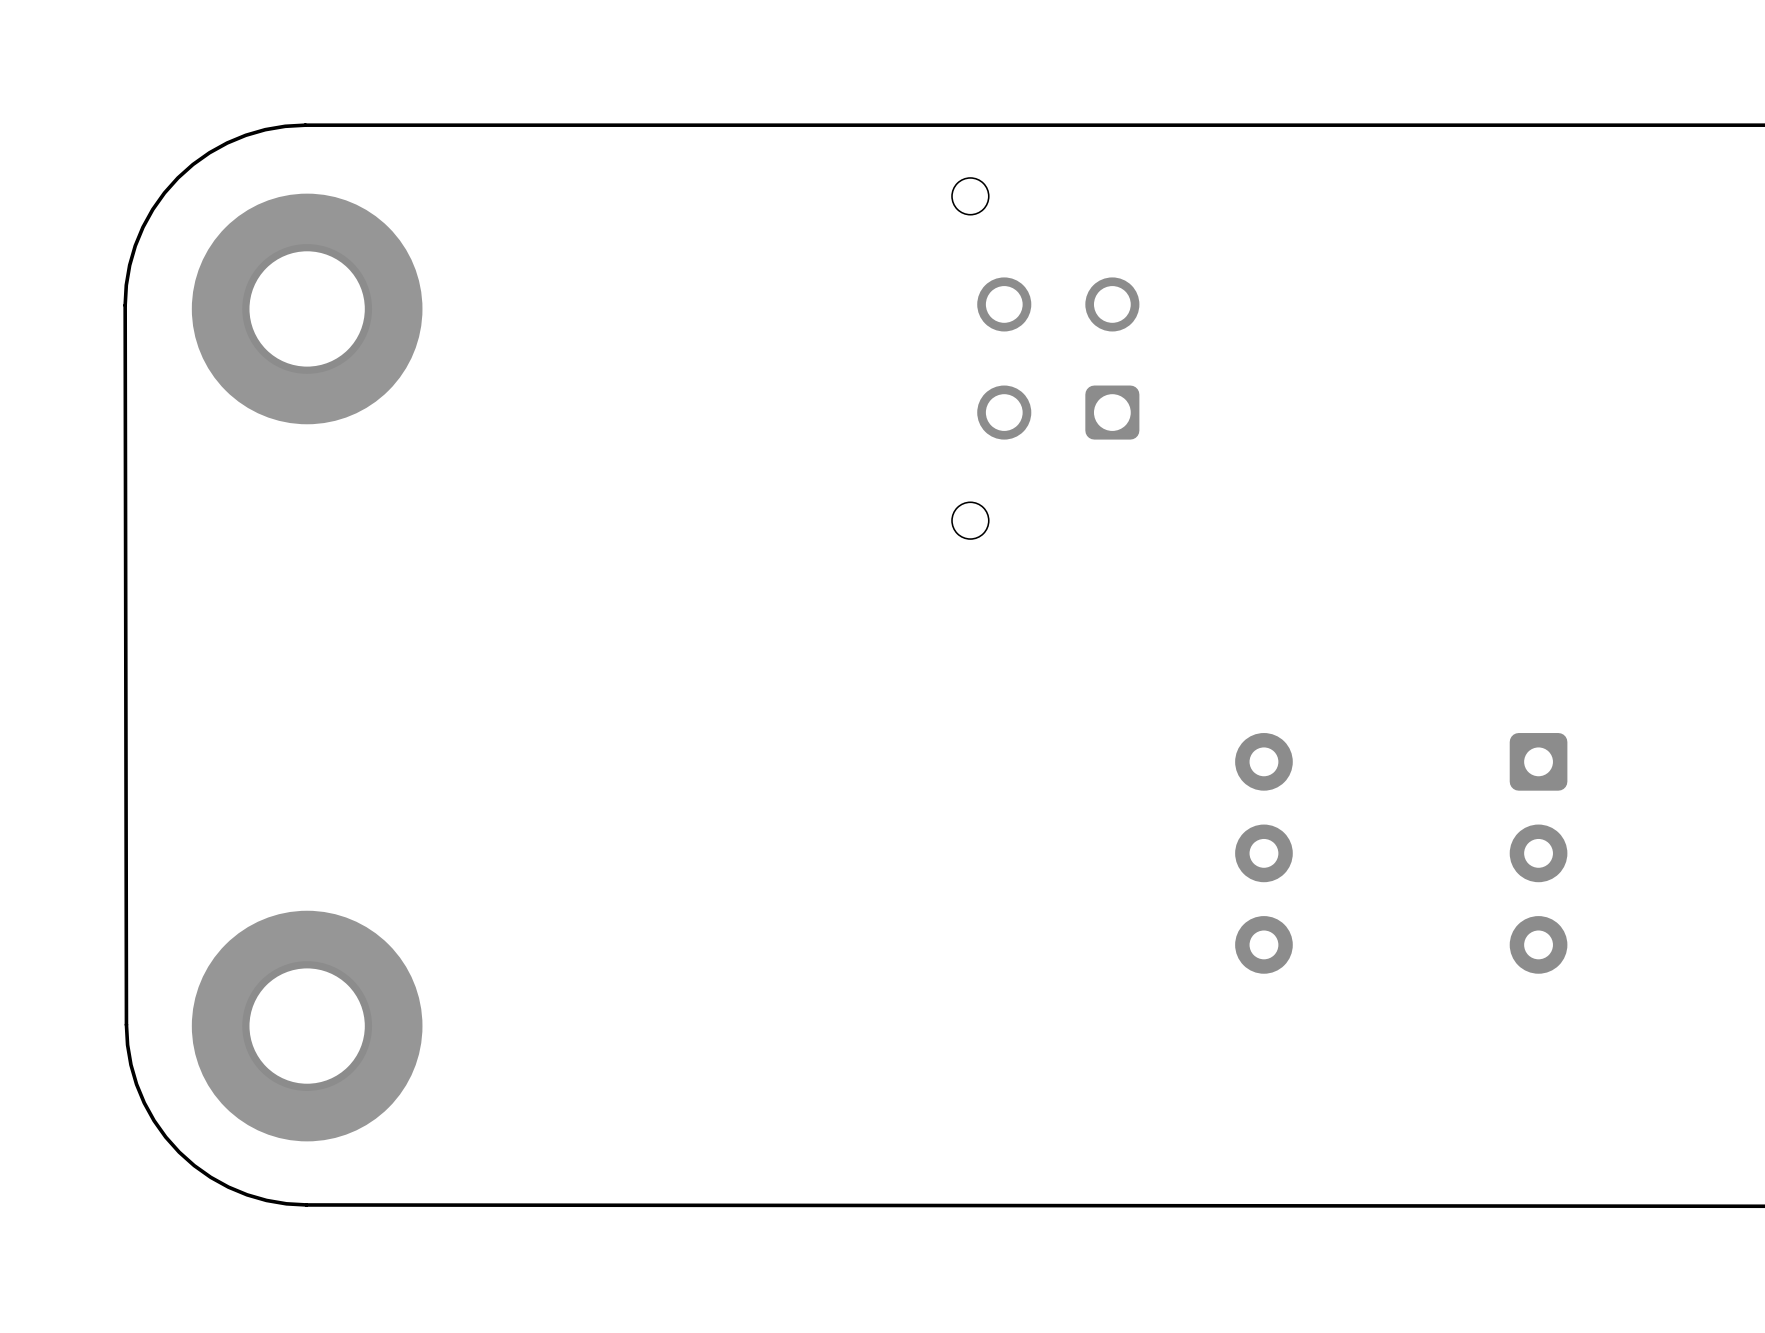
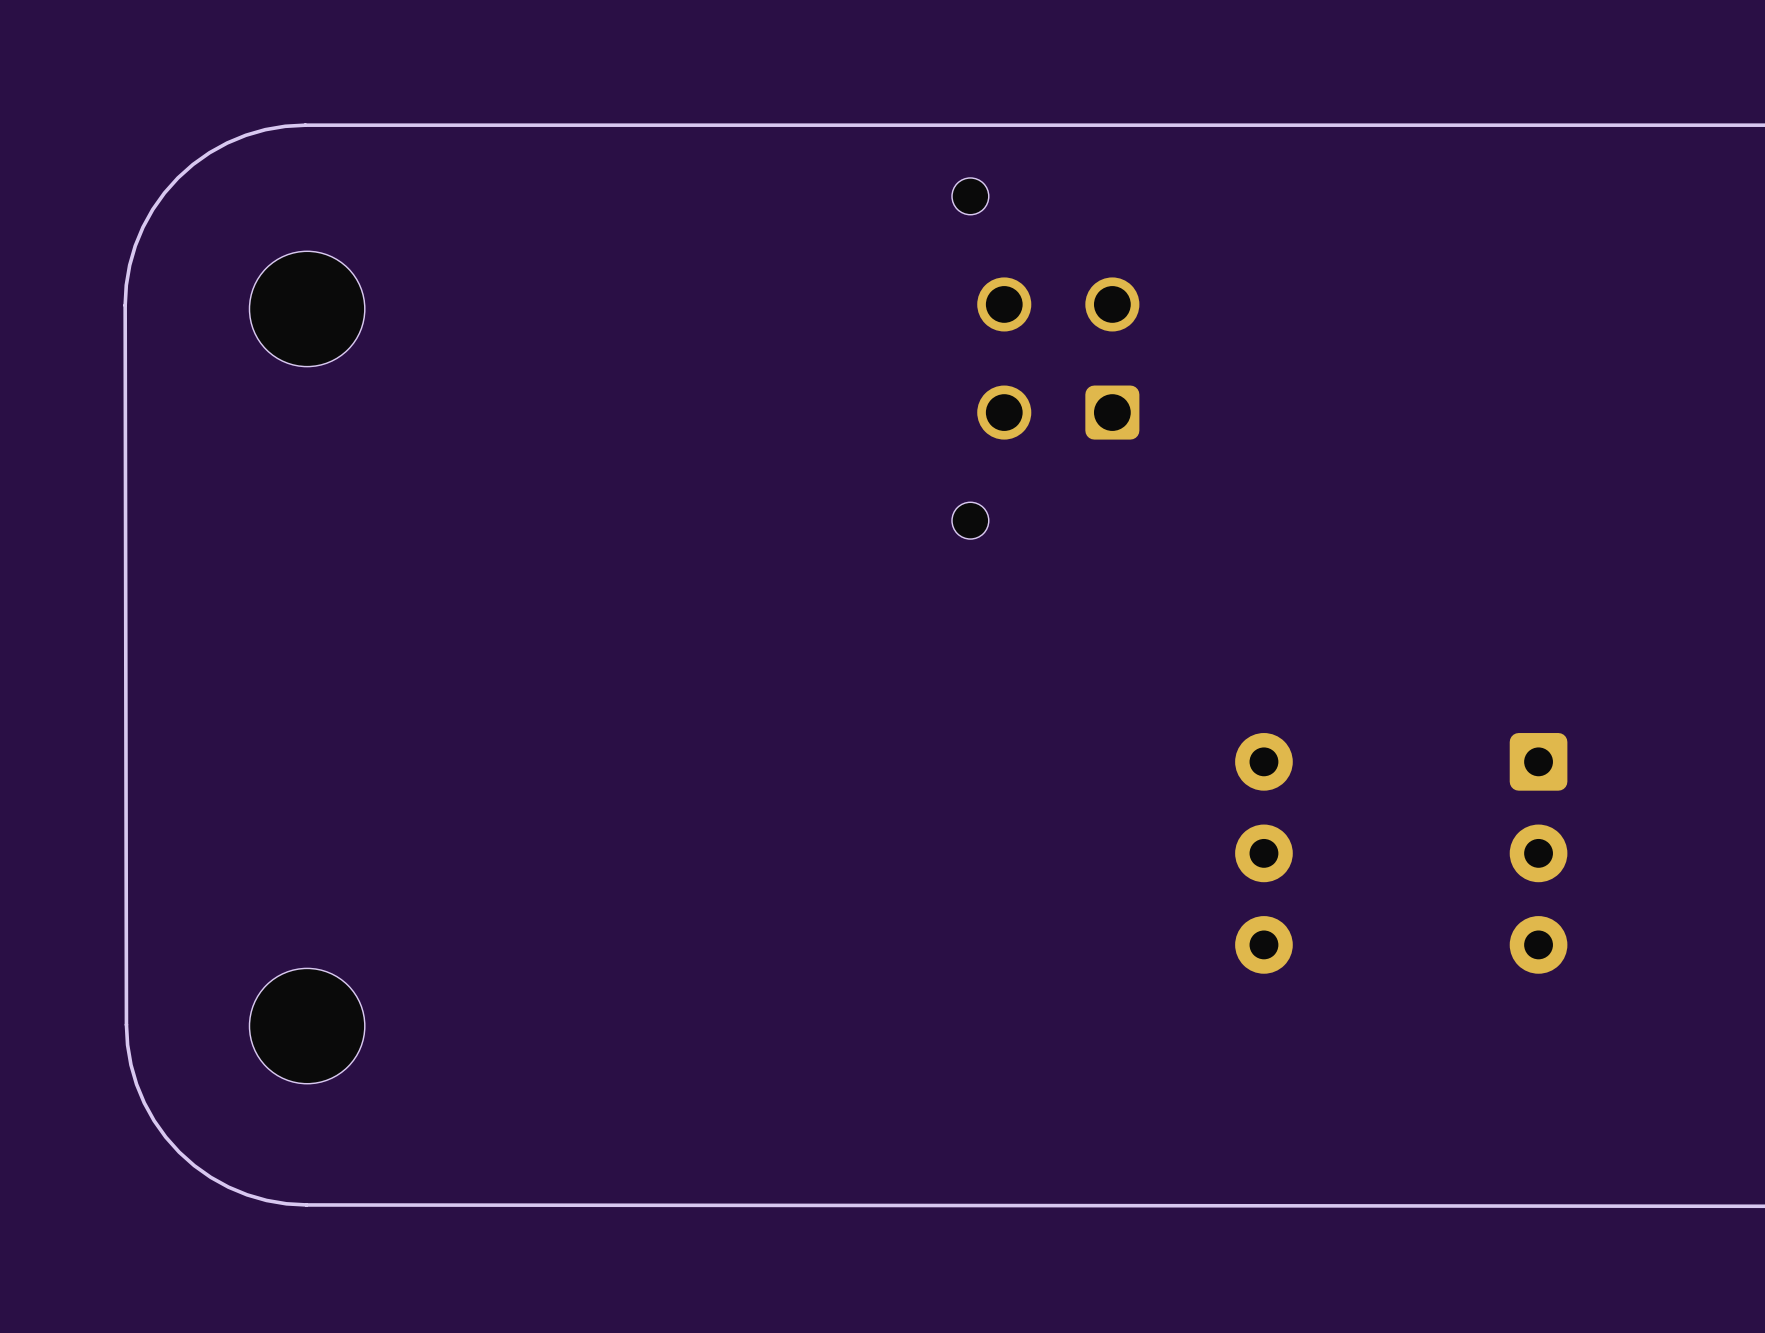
part footprint: [191, 193, 423, 425] -> [249, 251, 365, 367]
part footprint: [191, 910, 423, 1142] -> [249, 968, 365, 1084]

